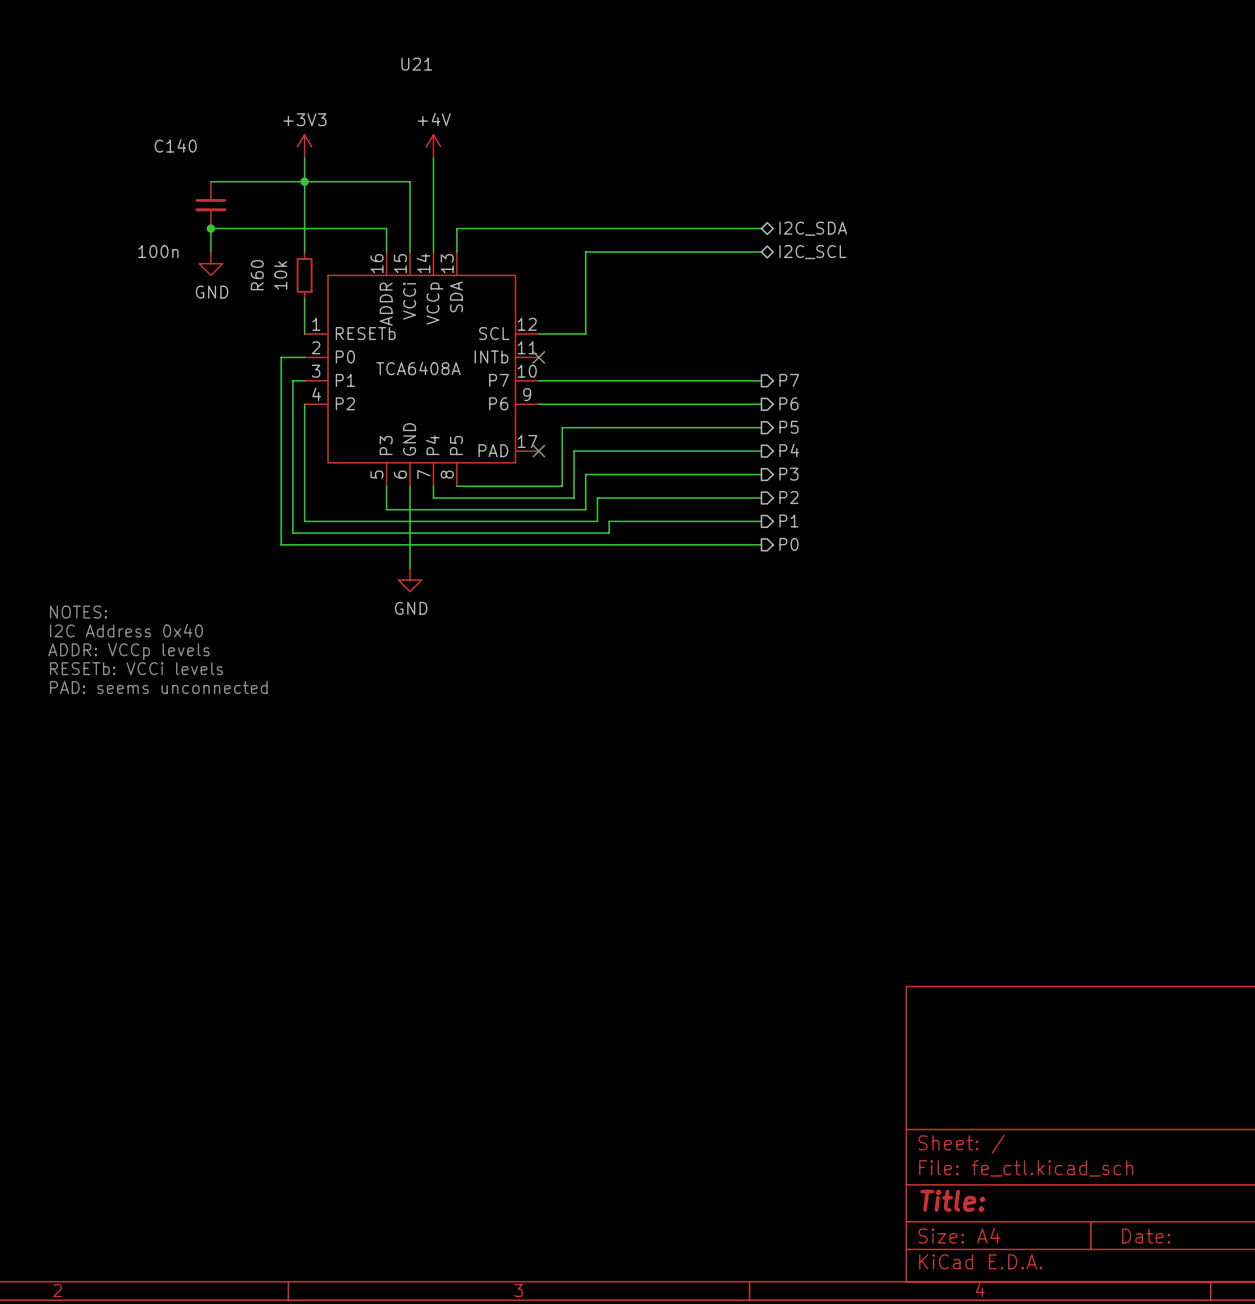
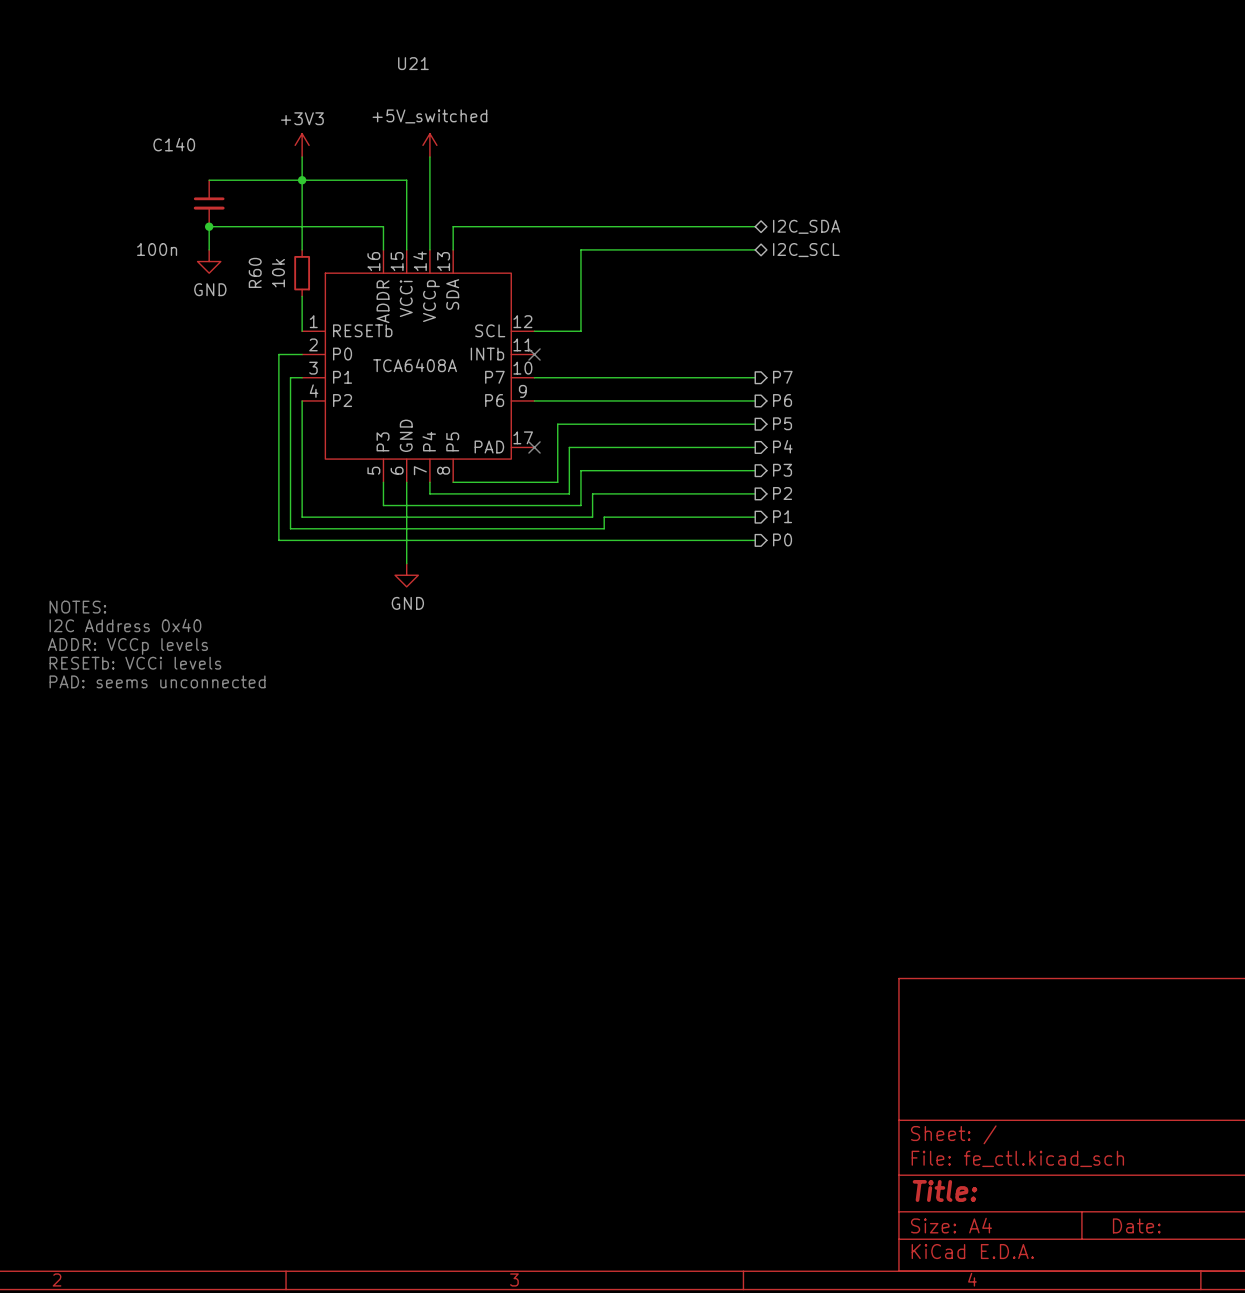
power symbol: +4V (433, 146) -> +5V_switched (429, 145)

